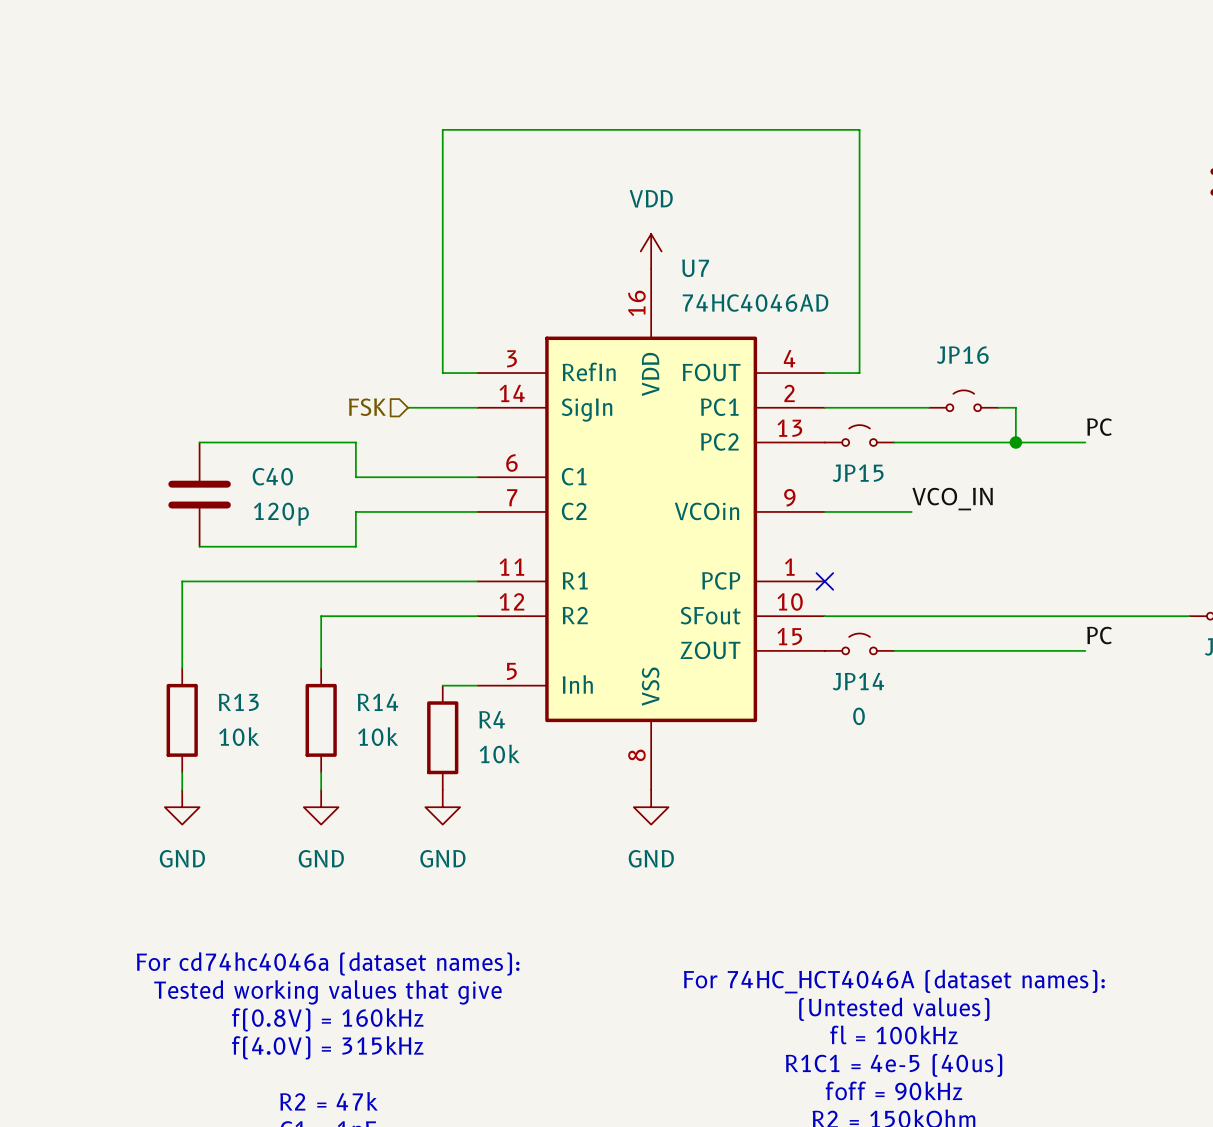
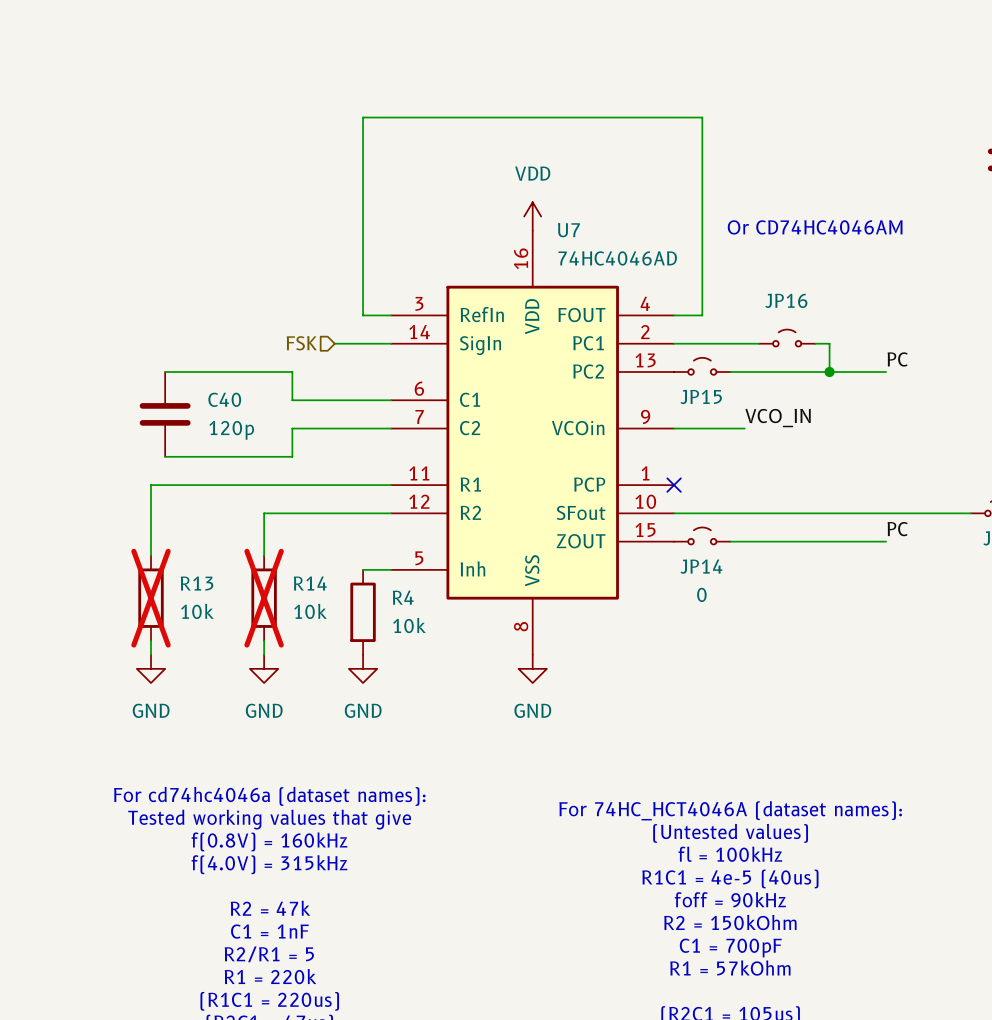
text: none -> Or CD74HC4046AM (815, 227)
R13 do-not-place cross: none -> (151, 598)
R14 do-not-place cross: none -> (264, 598)

